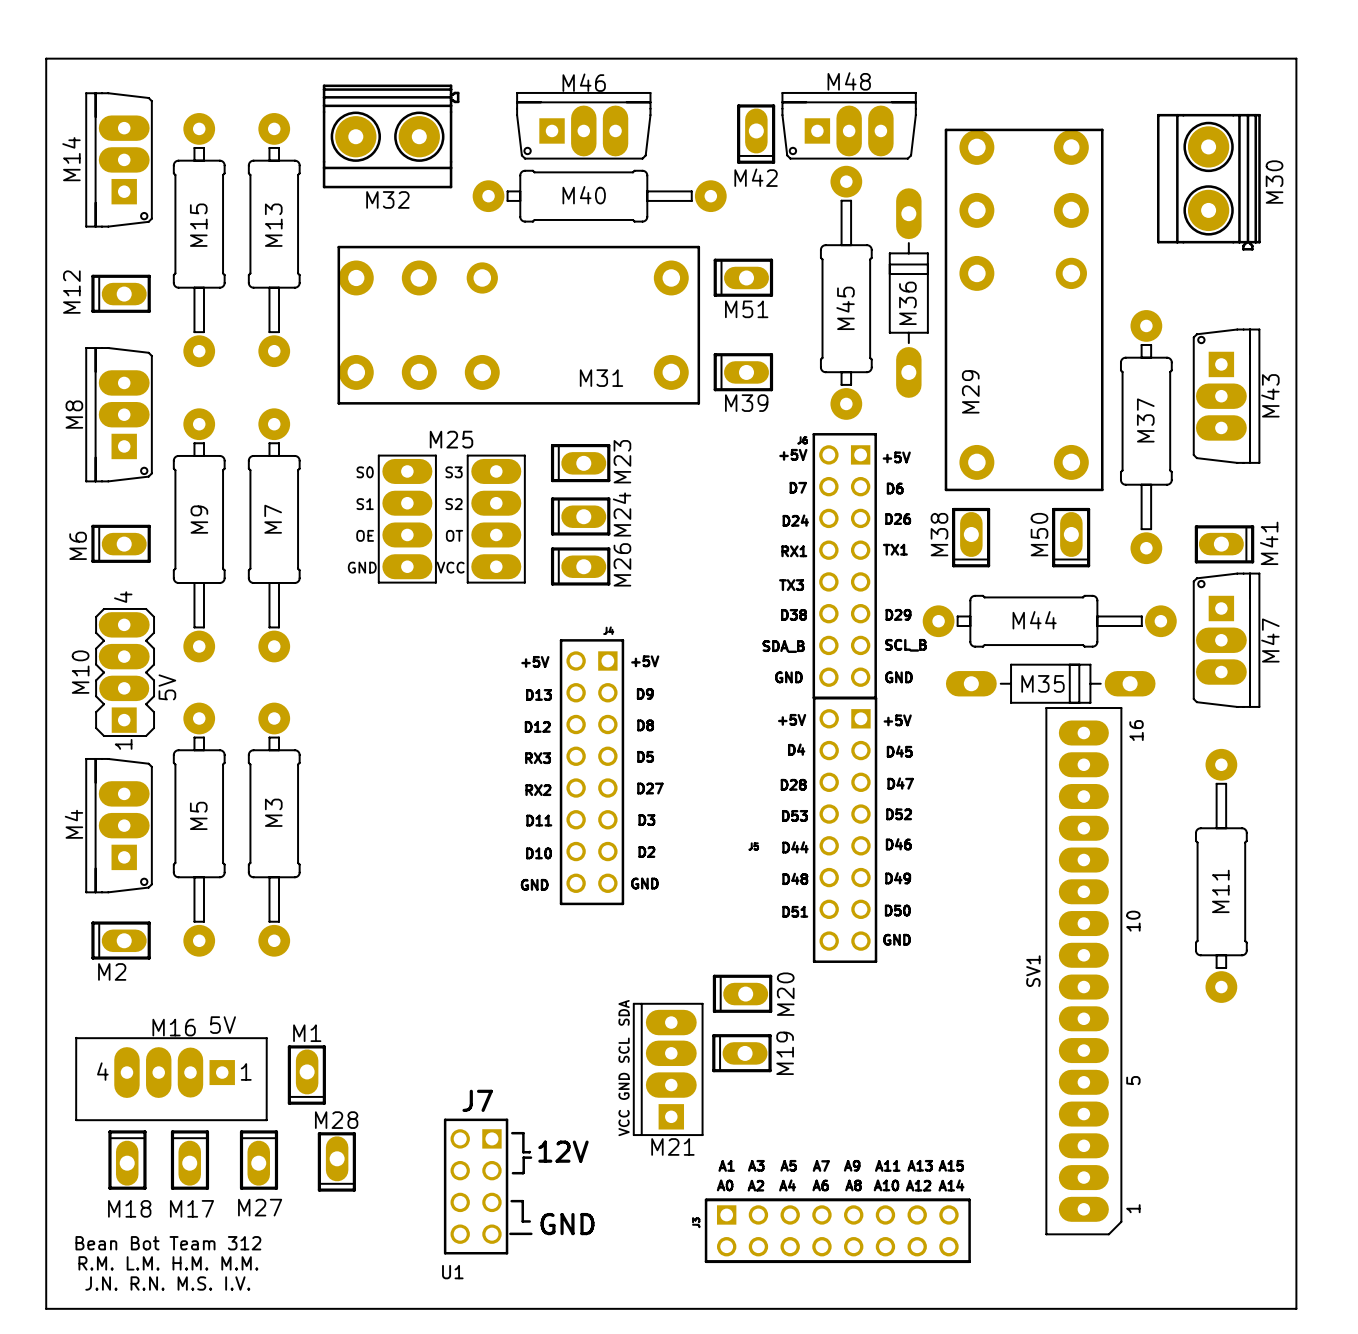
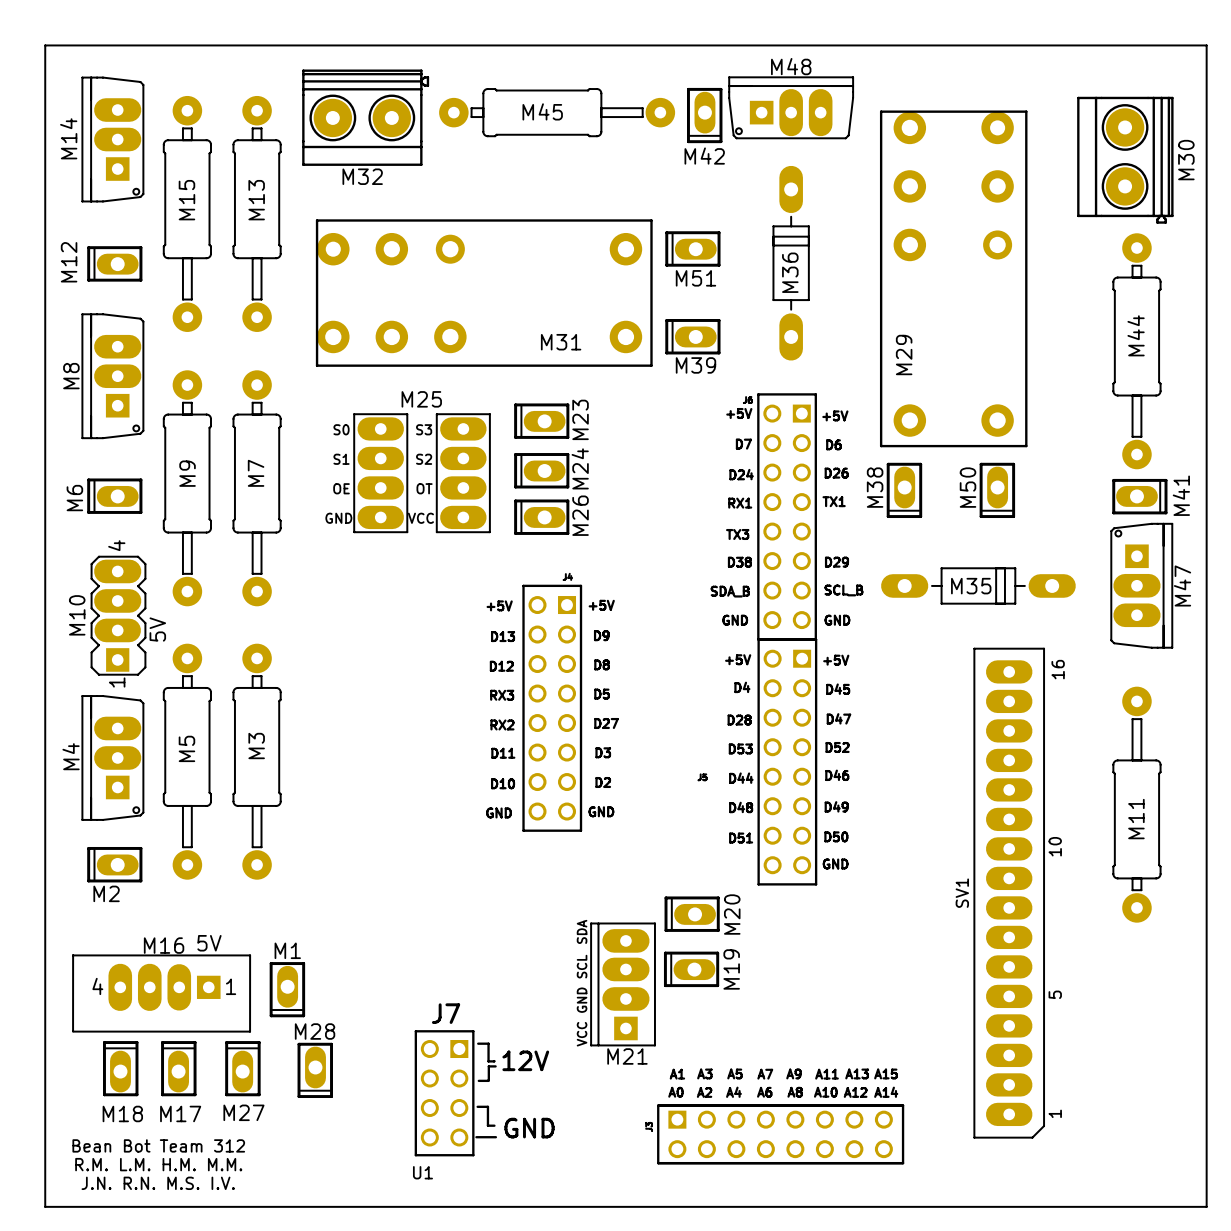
M46: (583, 125) -> none
M40: (599, 196) -> none
M45 rotation: 0° (846, 292) -> 90° clockwise (557, 112)
M45 position: (846, 292) -> (557, 112)
M36 position: (908, 293) -> (791, 263)
M43: (1226, 396) -> none
M37: (1146, 437) -> none
M44 rotation: 0° (1049, 621) -> 90° clockwise (1136, 351)
M44 position: (1049, 621) -> (1136, 351)
M35 position: (1050, 683) -> (978, 585)

